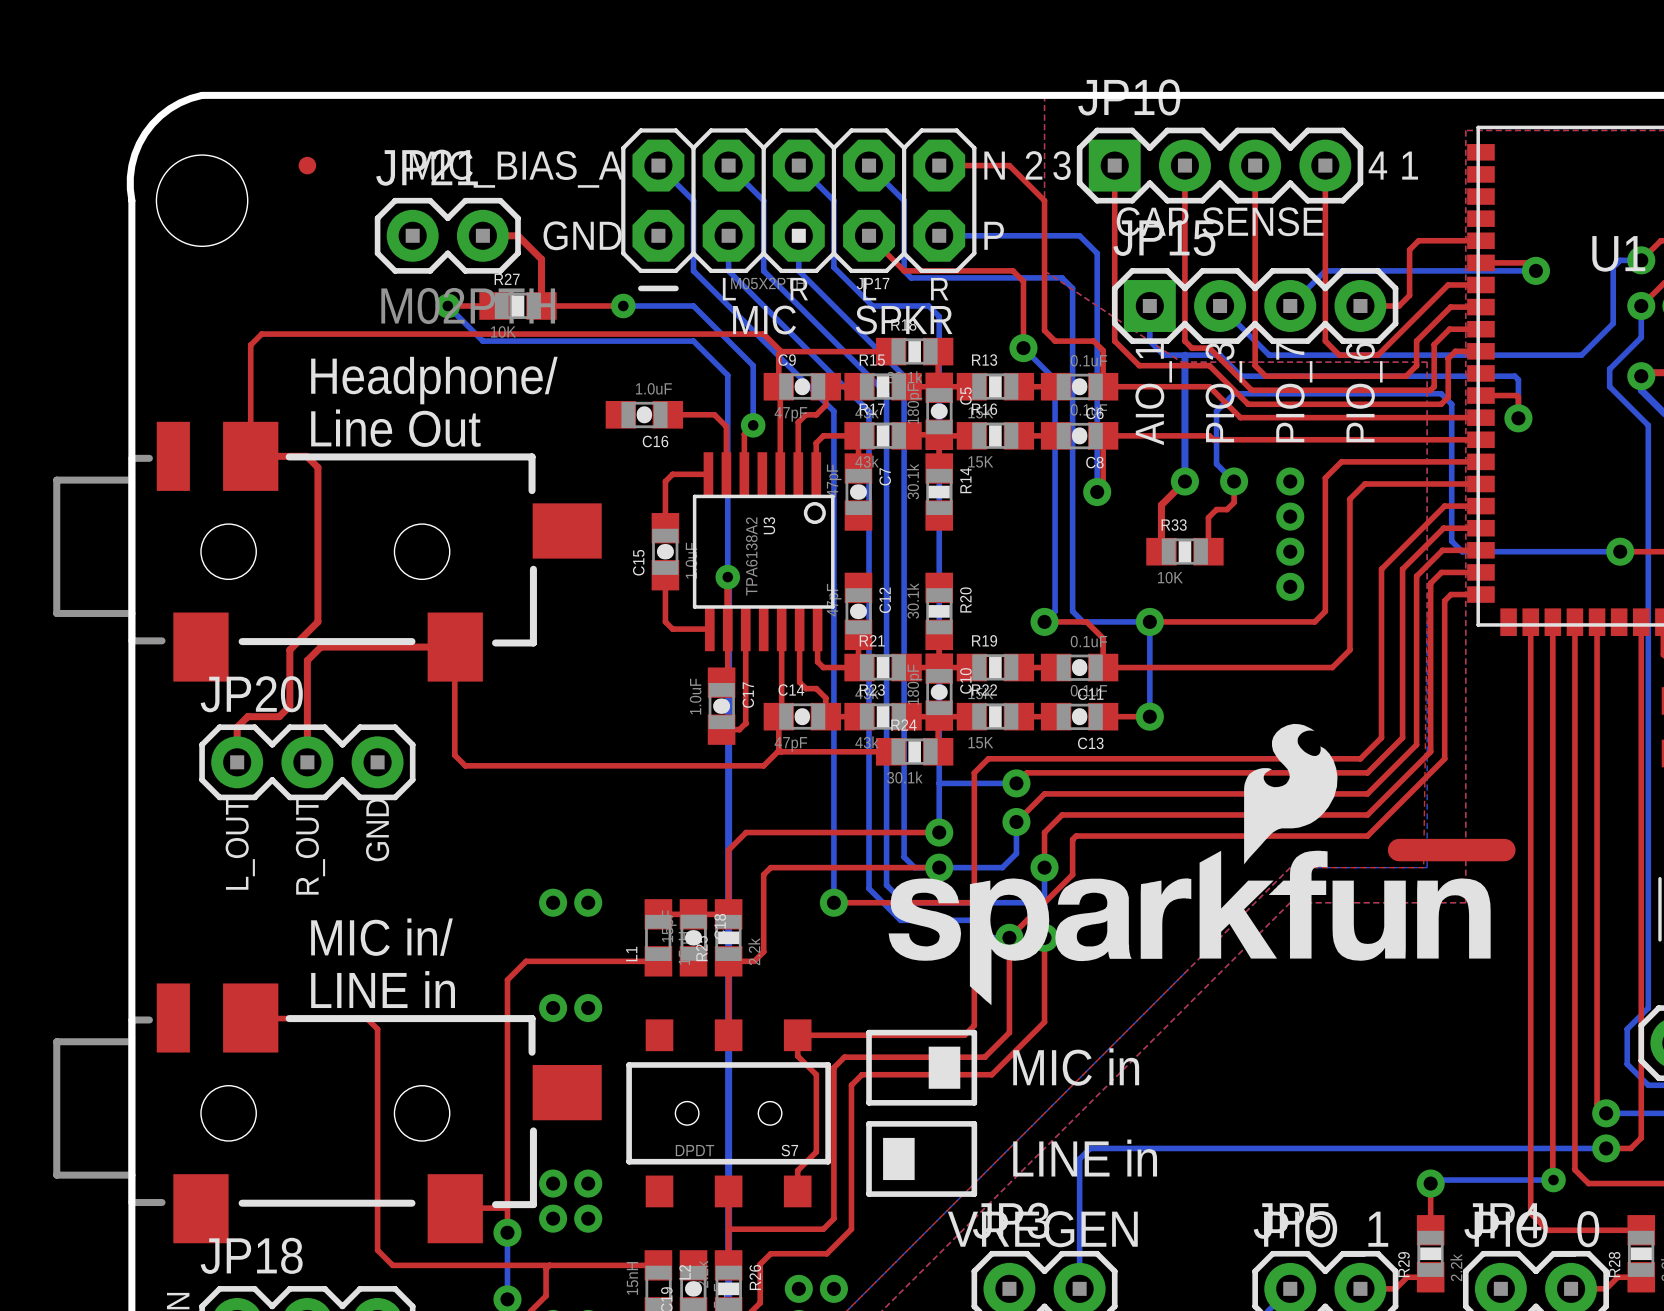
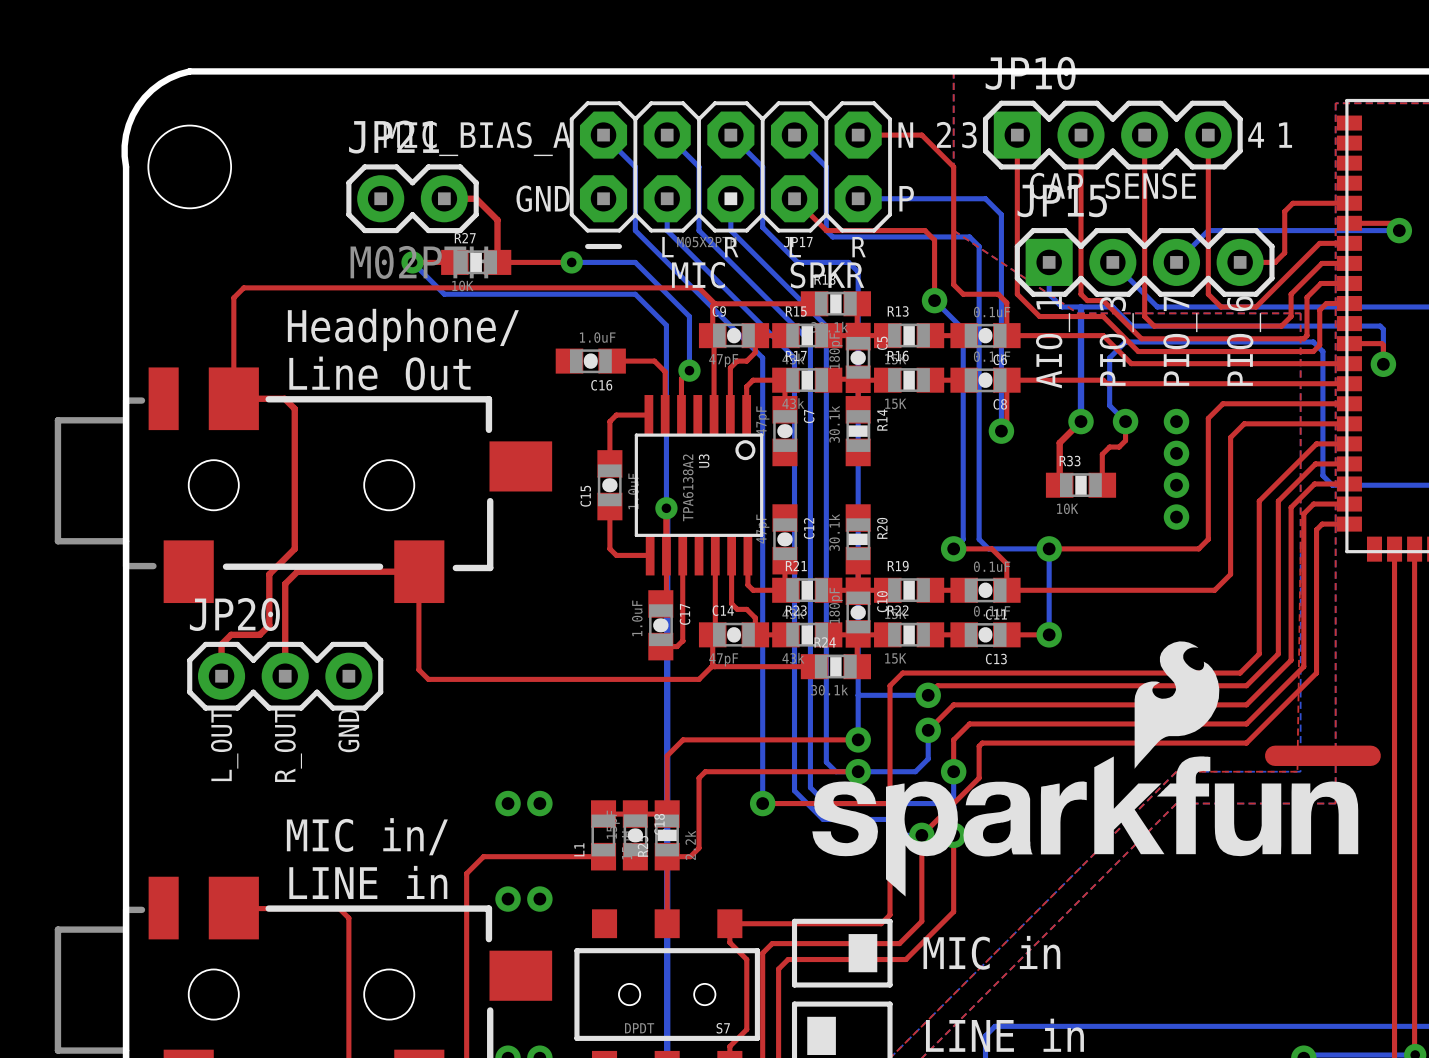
part: (307, 165) -> none

